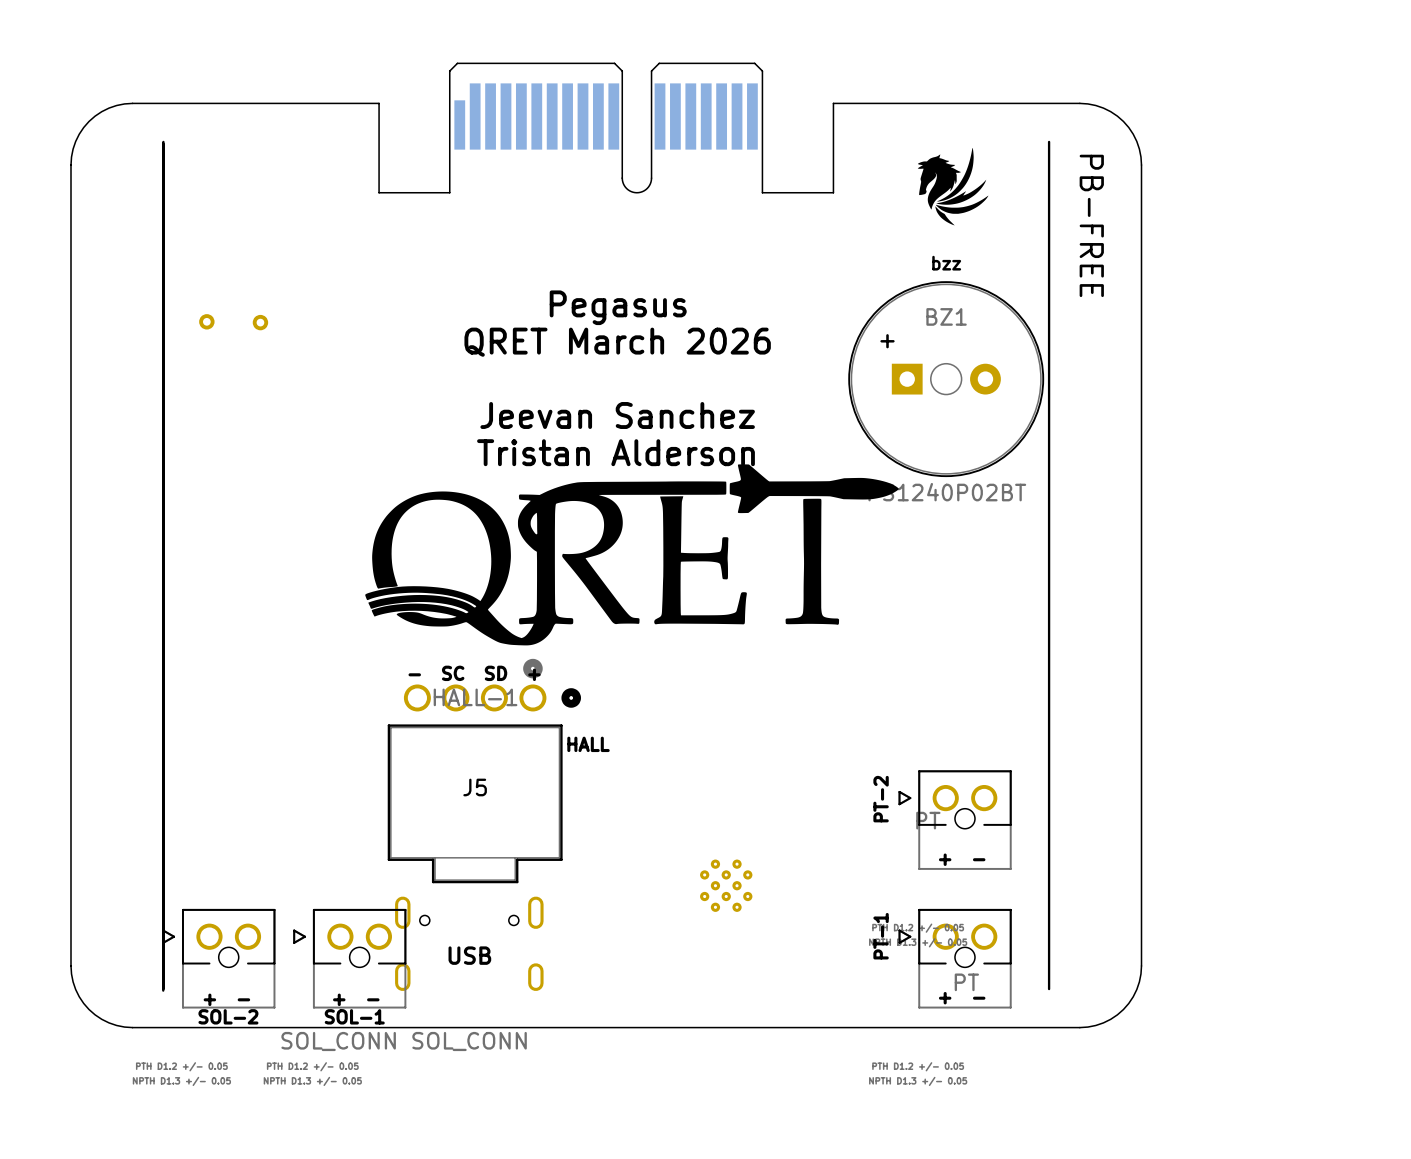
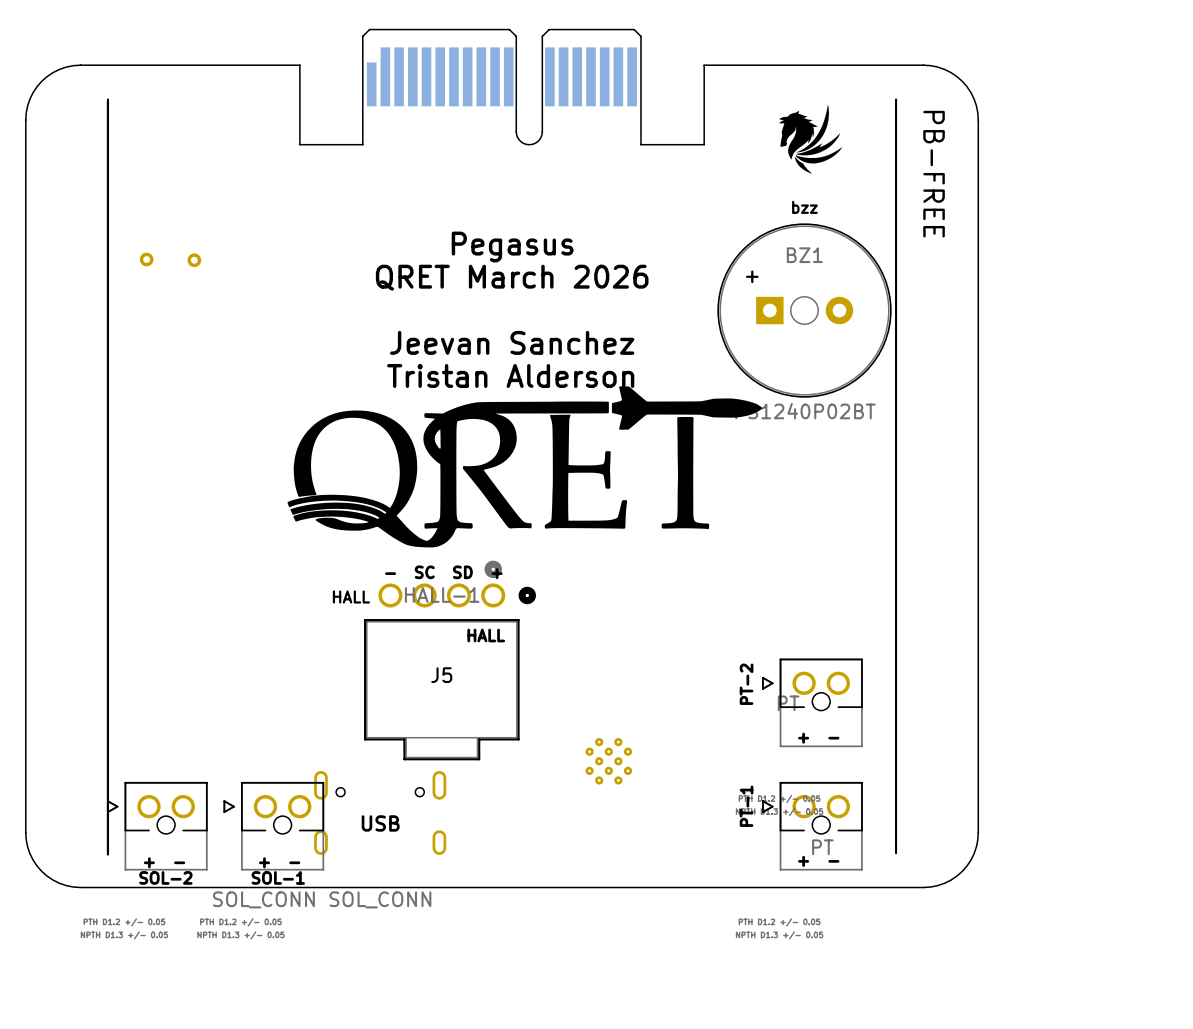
text position: - SC SD + (474, 673) -> - SC SD + (443, 572)
text: none -> HALL (351, 596)
J5 position: (484, 771) -> (450, 660)

